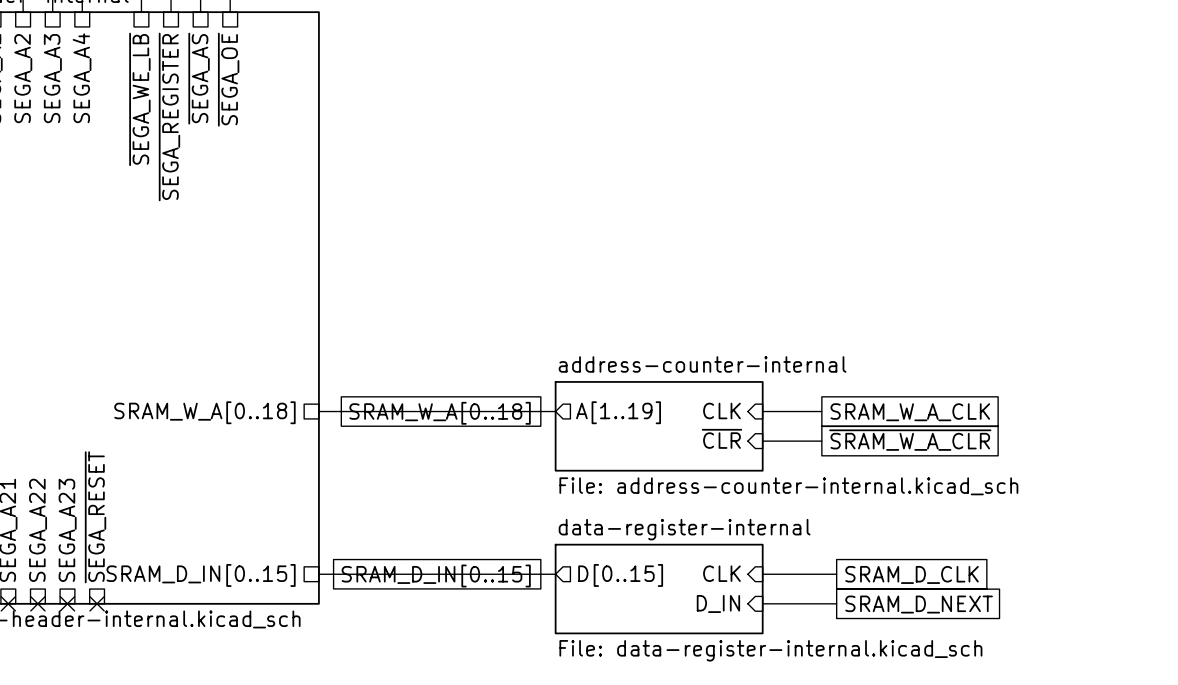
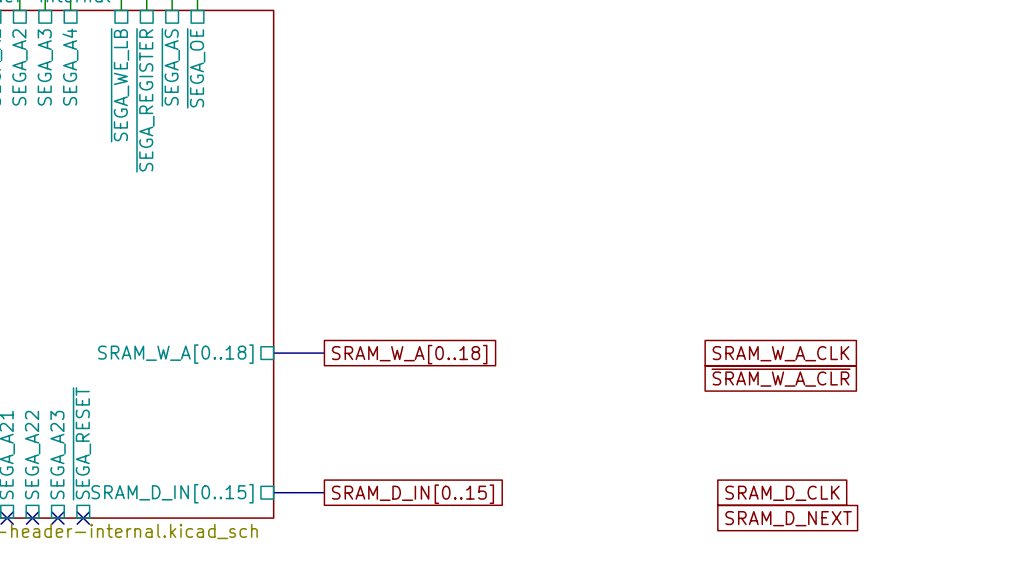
sheet pin: CLK (721, 410) -> none
bus: (378, 411) (555, 411) -> none
wire: (762, 411) (821, 411) -> none
sheet pin: A[1..19] (618, 412) -> none
global label rotation: 0° (440, 413) -> 180° (409, 354)
sheet address-counter-internal: File: address-counter-internal.kicad_sch (659, 426) -> none
sheet pin: ~{CLR} (721, 438) -> none
wire: (762, 441) (821, 441) -> none
sheet pin: CLK (721, 573) -> none
bus: (378, 574) (555, 574) -> none
wire: (762, 574) (836, 574) -> none
sheet pin: D[0..15] (620, 575) -> none
global label rotation: 0° (436, 576) -> 180° (412, 494)
sheet data-register-internal: File: data-register-internal.kicad_sch (659, 589) -> none
sheet pin: D_IN (718, 603) -> none
wire: (762, 603) (836, 603) -> none

